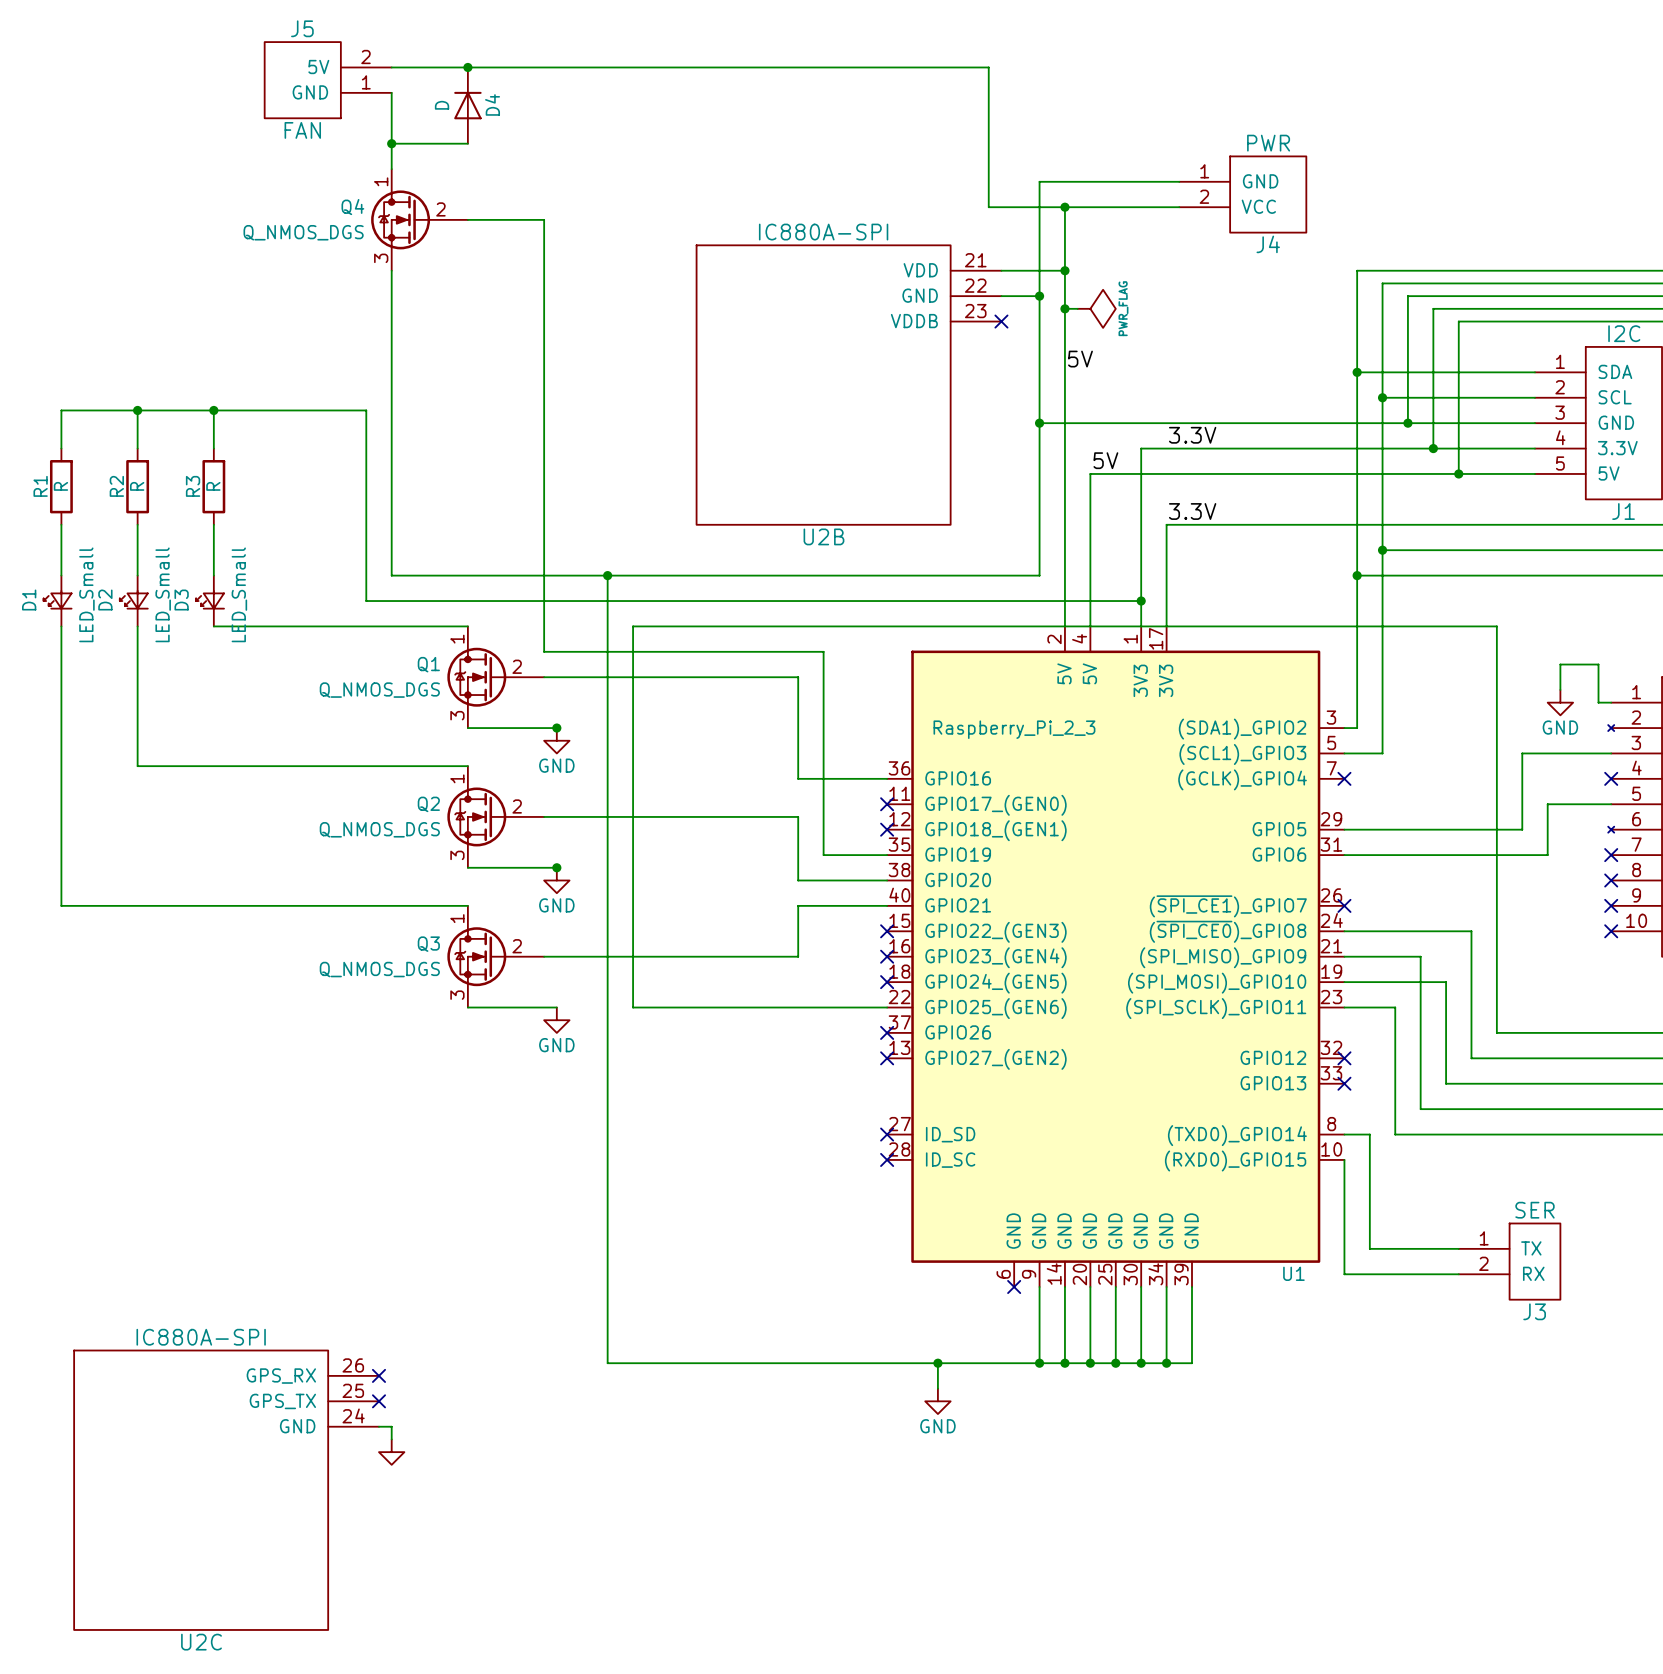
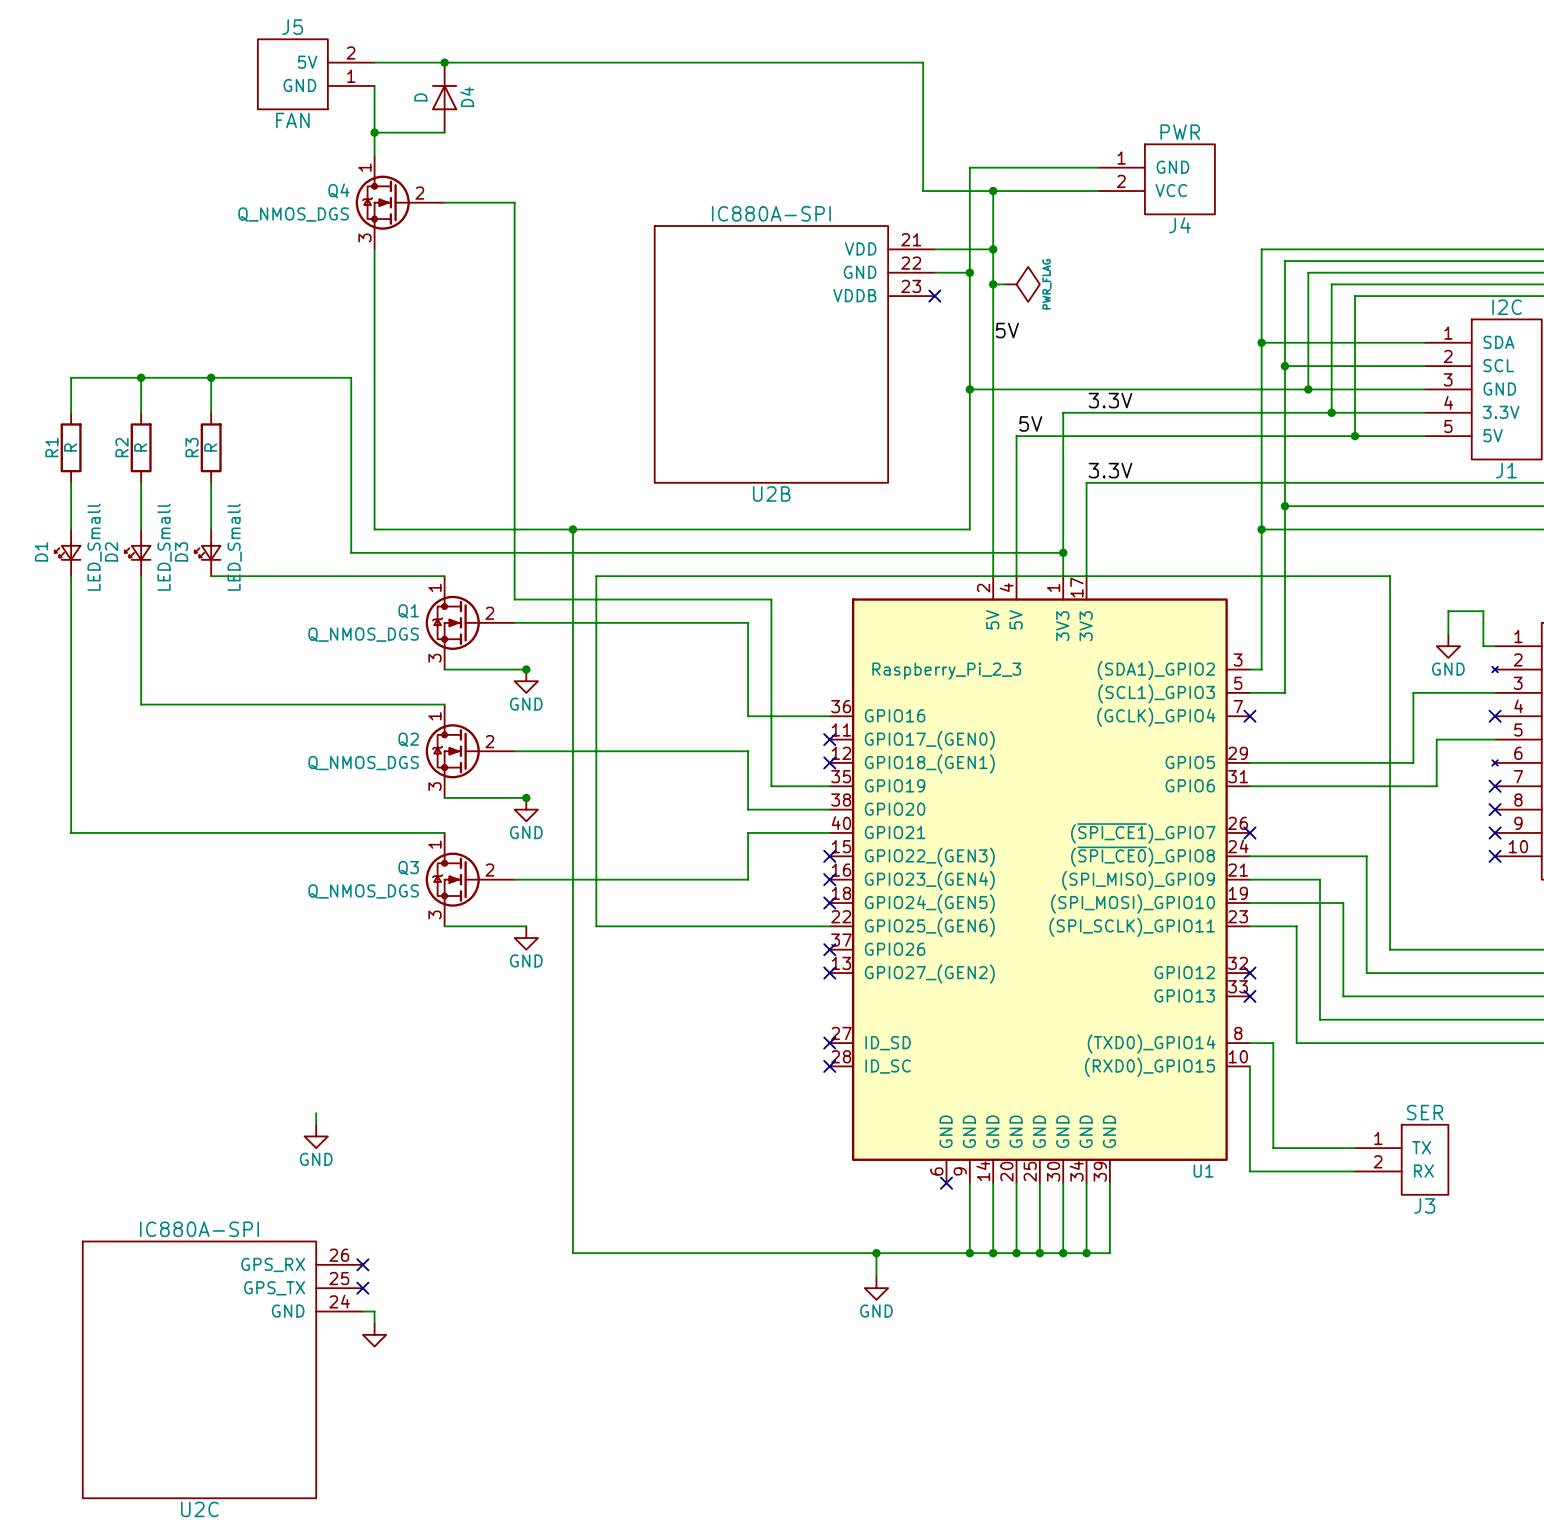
wire: none -> (316, 1113) (316, 1124)
power symbol: none -> GND (316, 1136)

